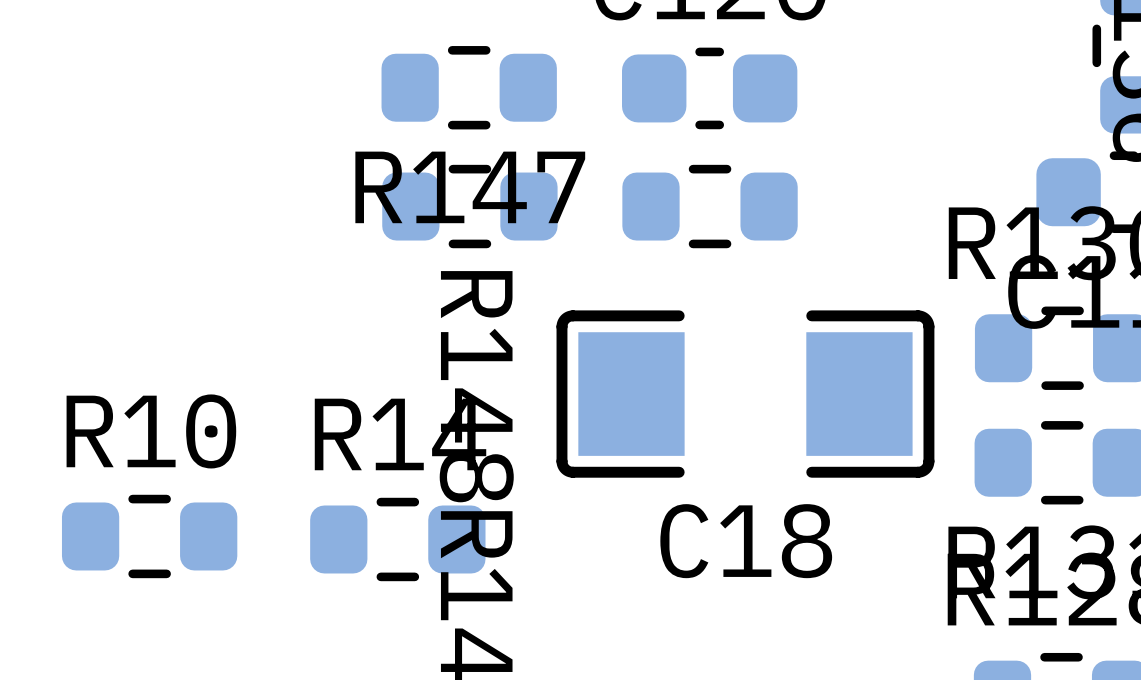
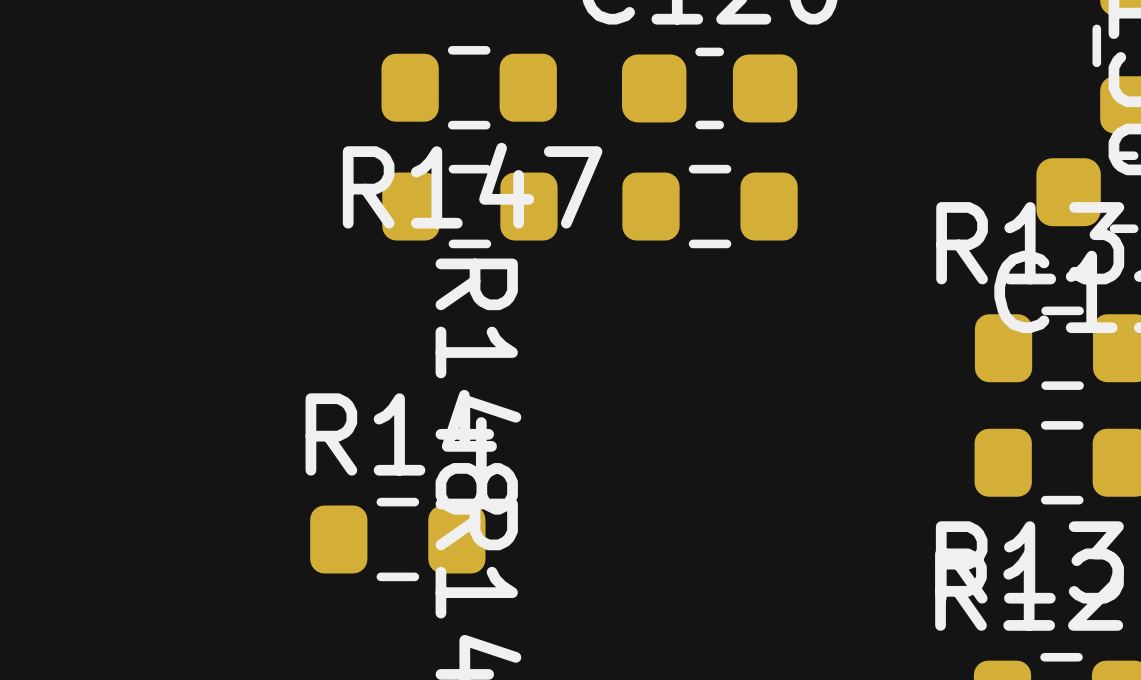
C18: (745, 394) -> none
R10: (149, 536) -> none

